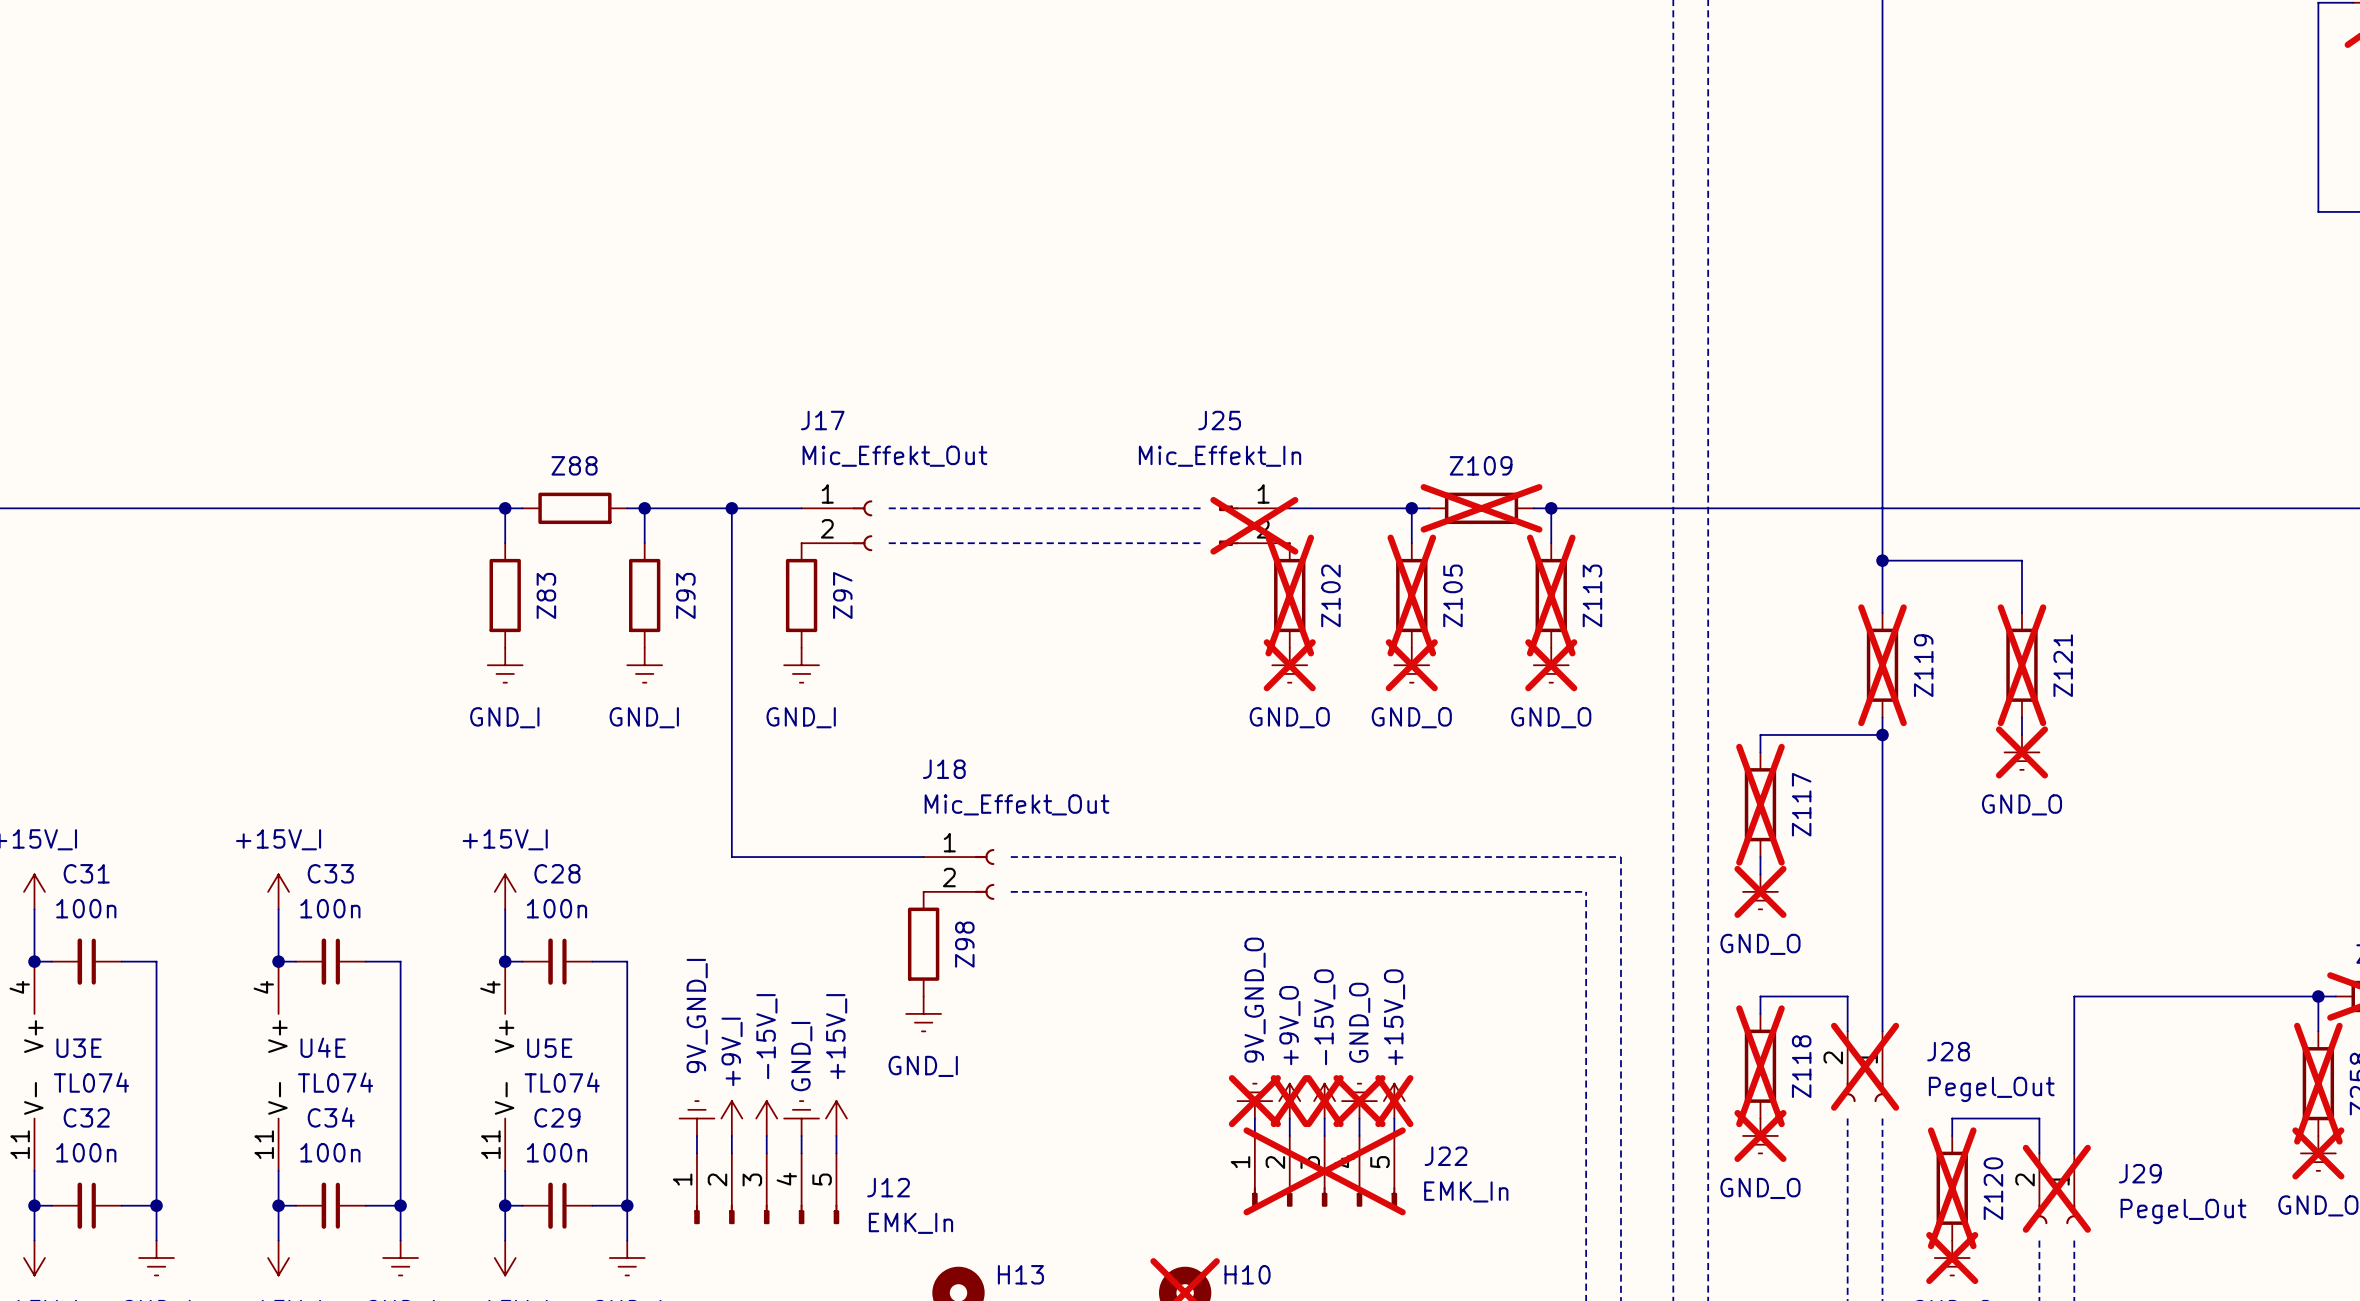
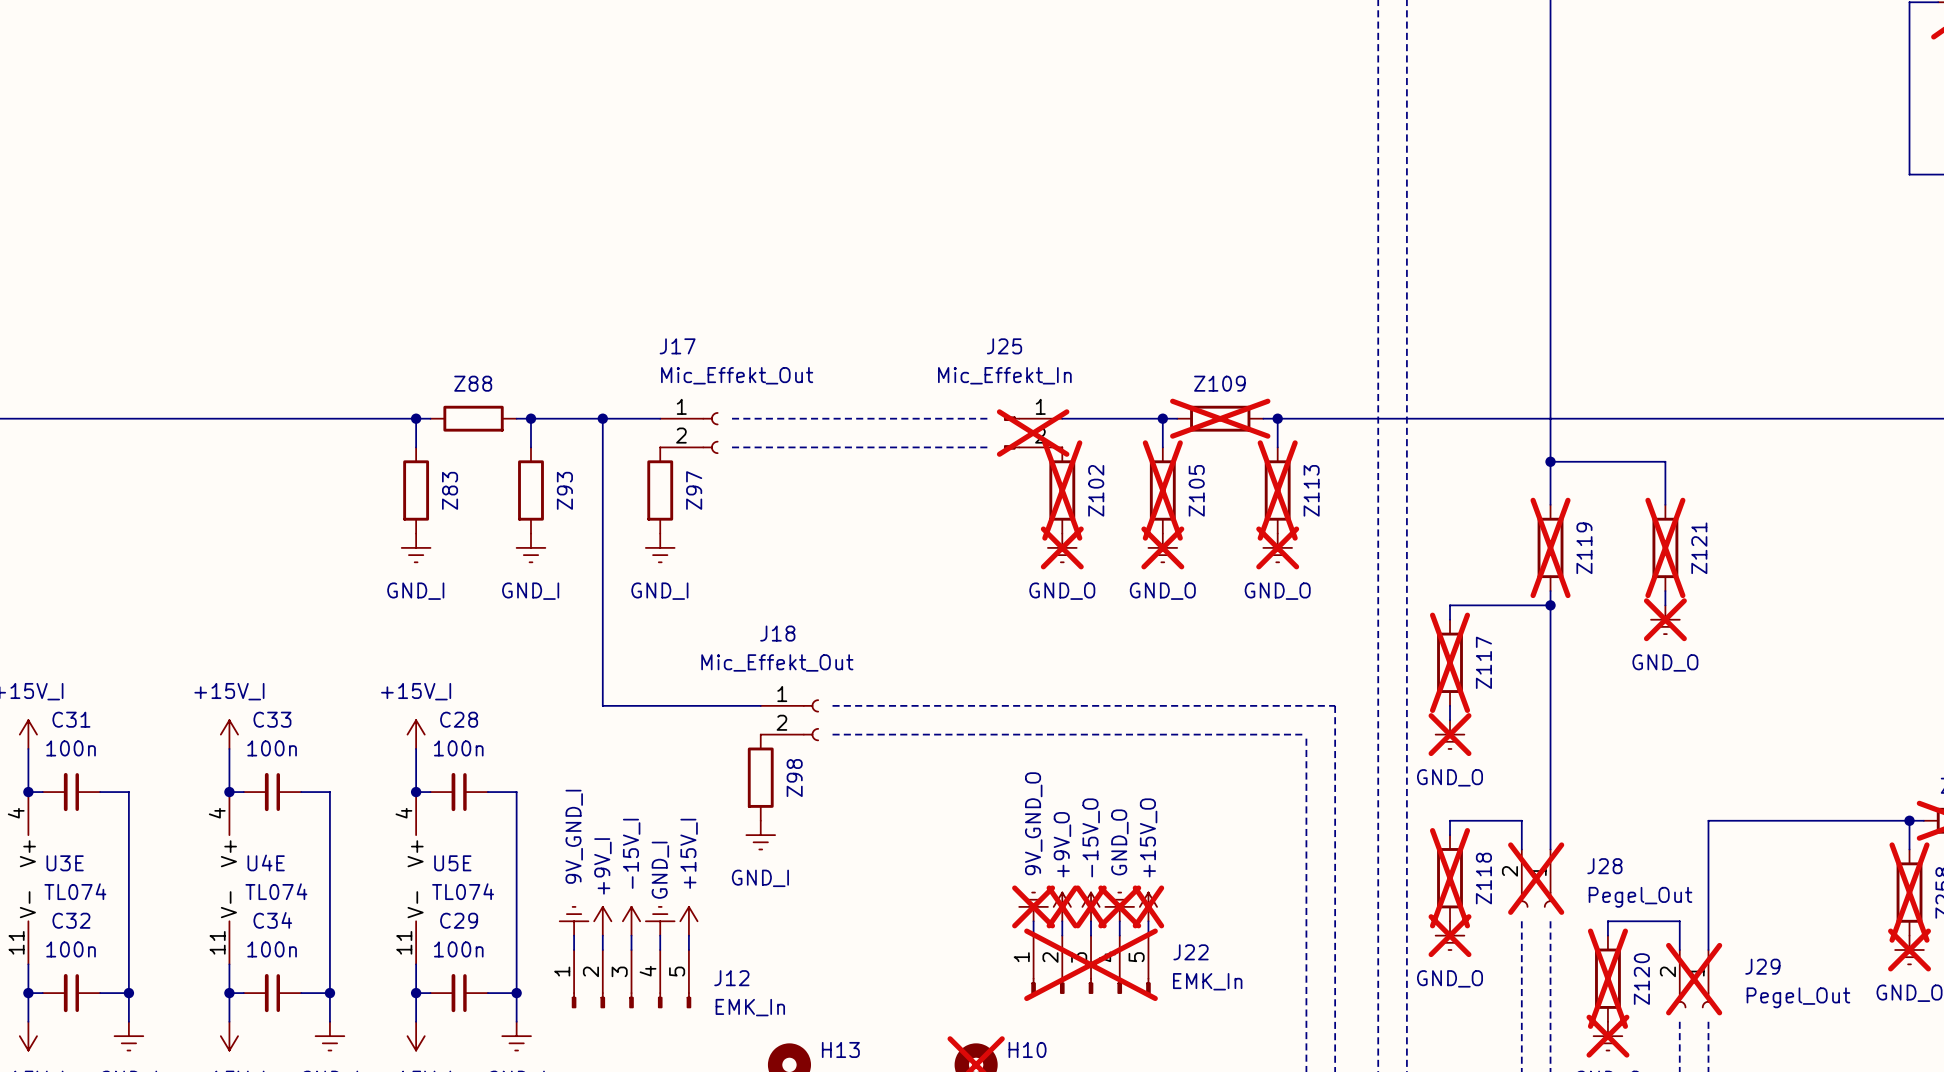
J18 value position: Mic_Effekt_Out (1016, 804) -> Mic_Effekt_Out (777, 662)

